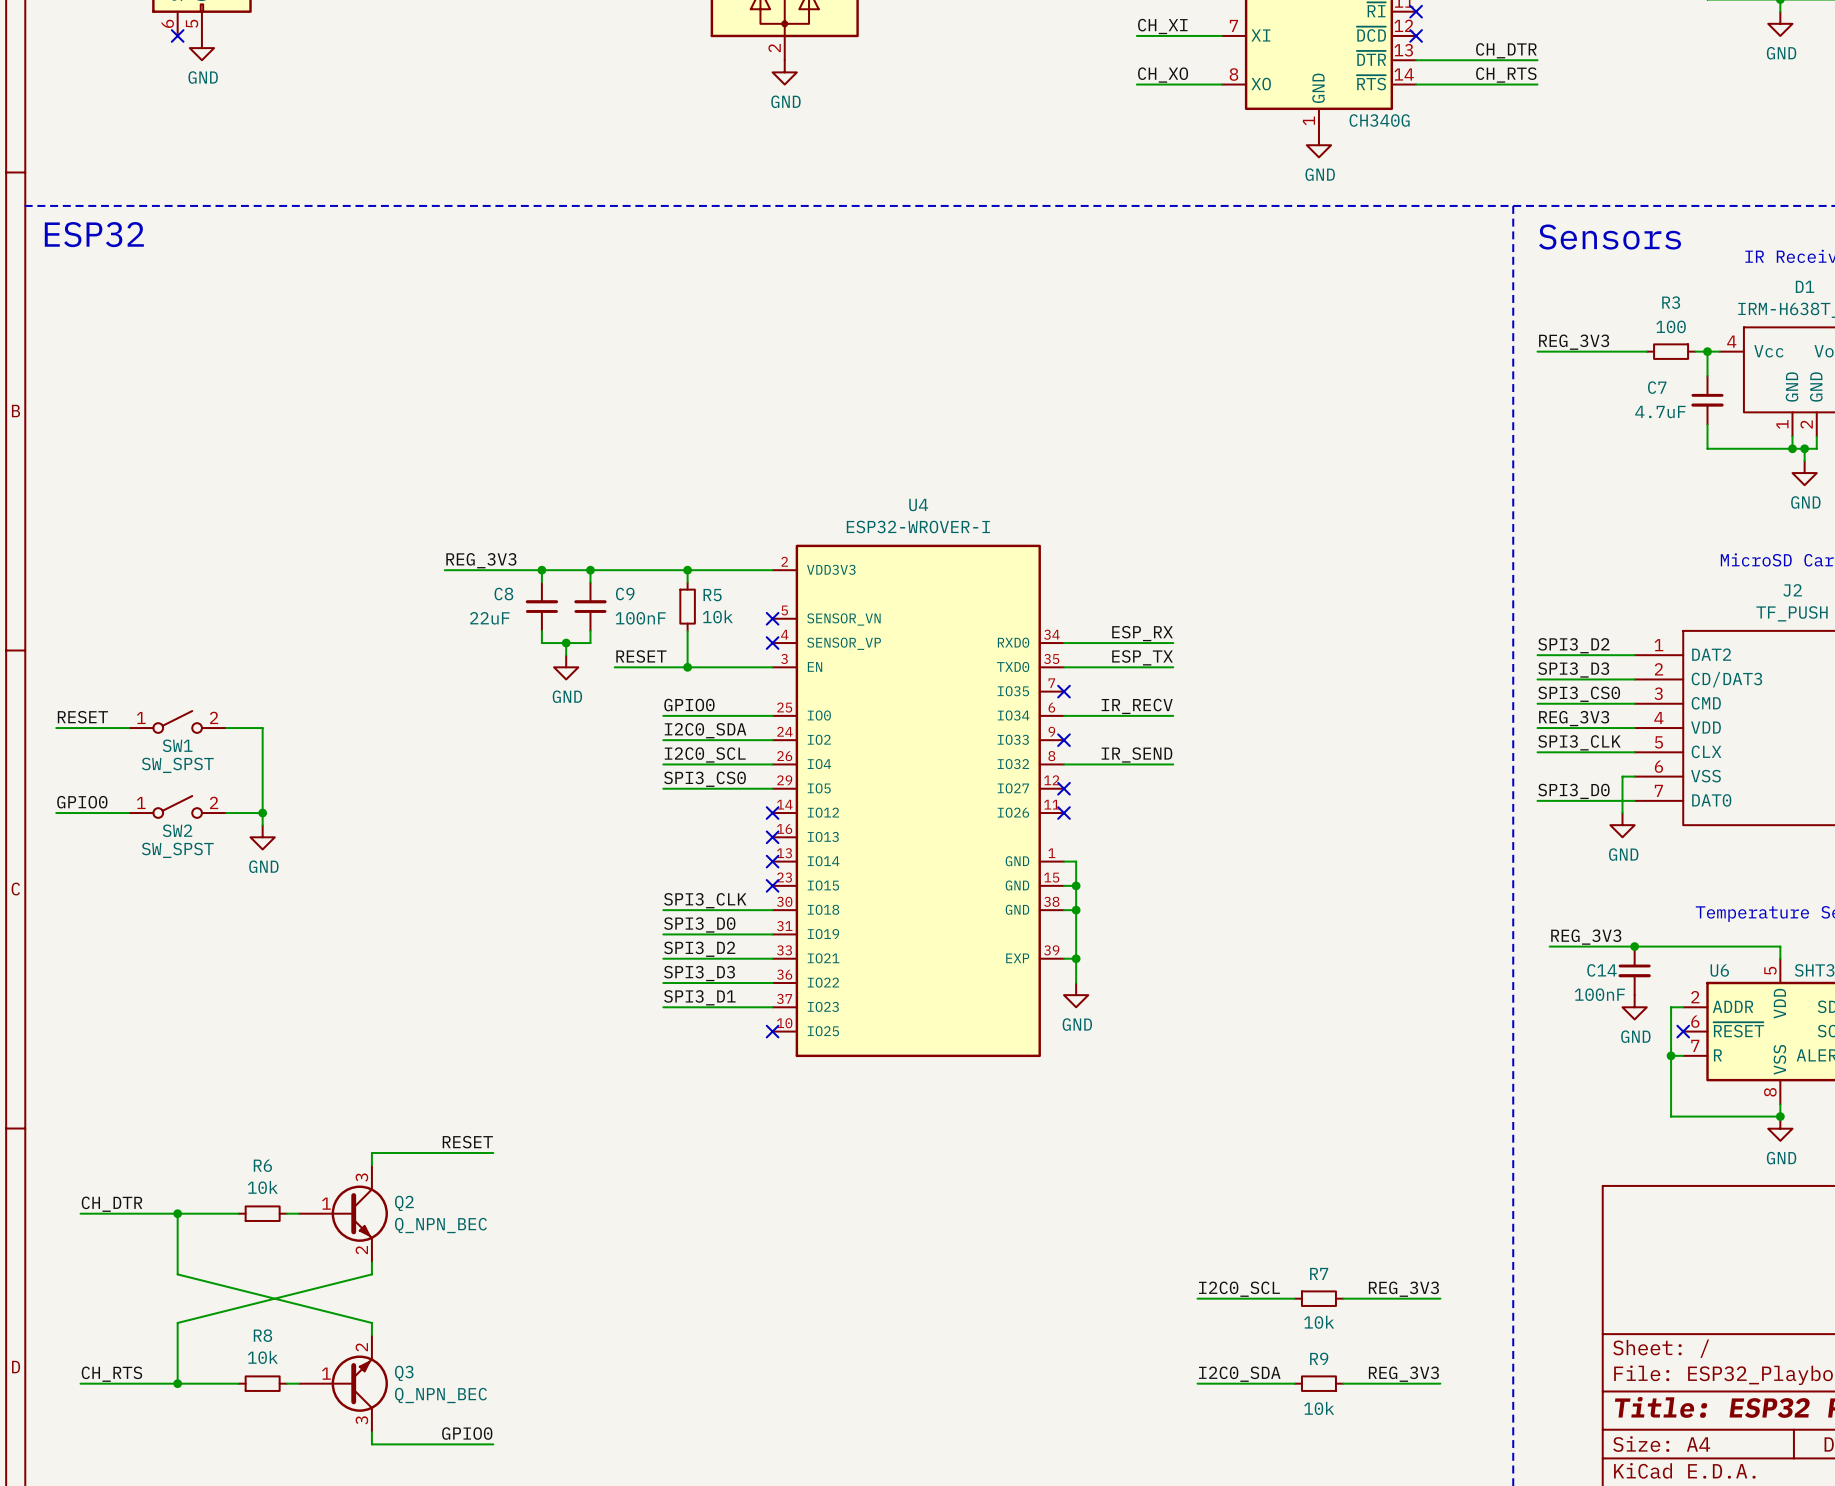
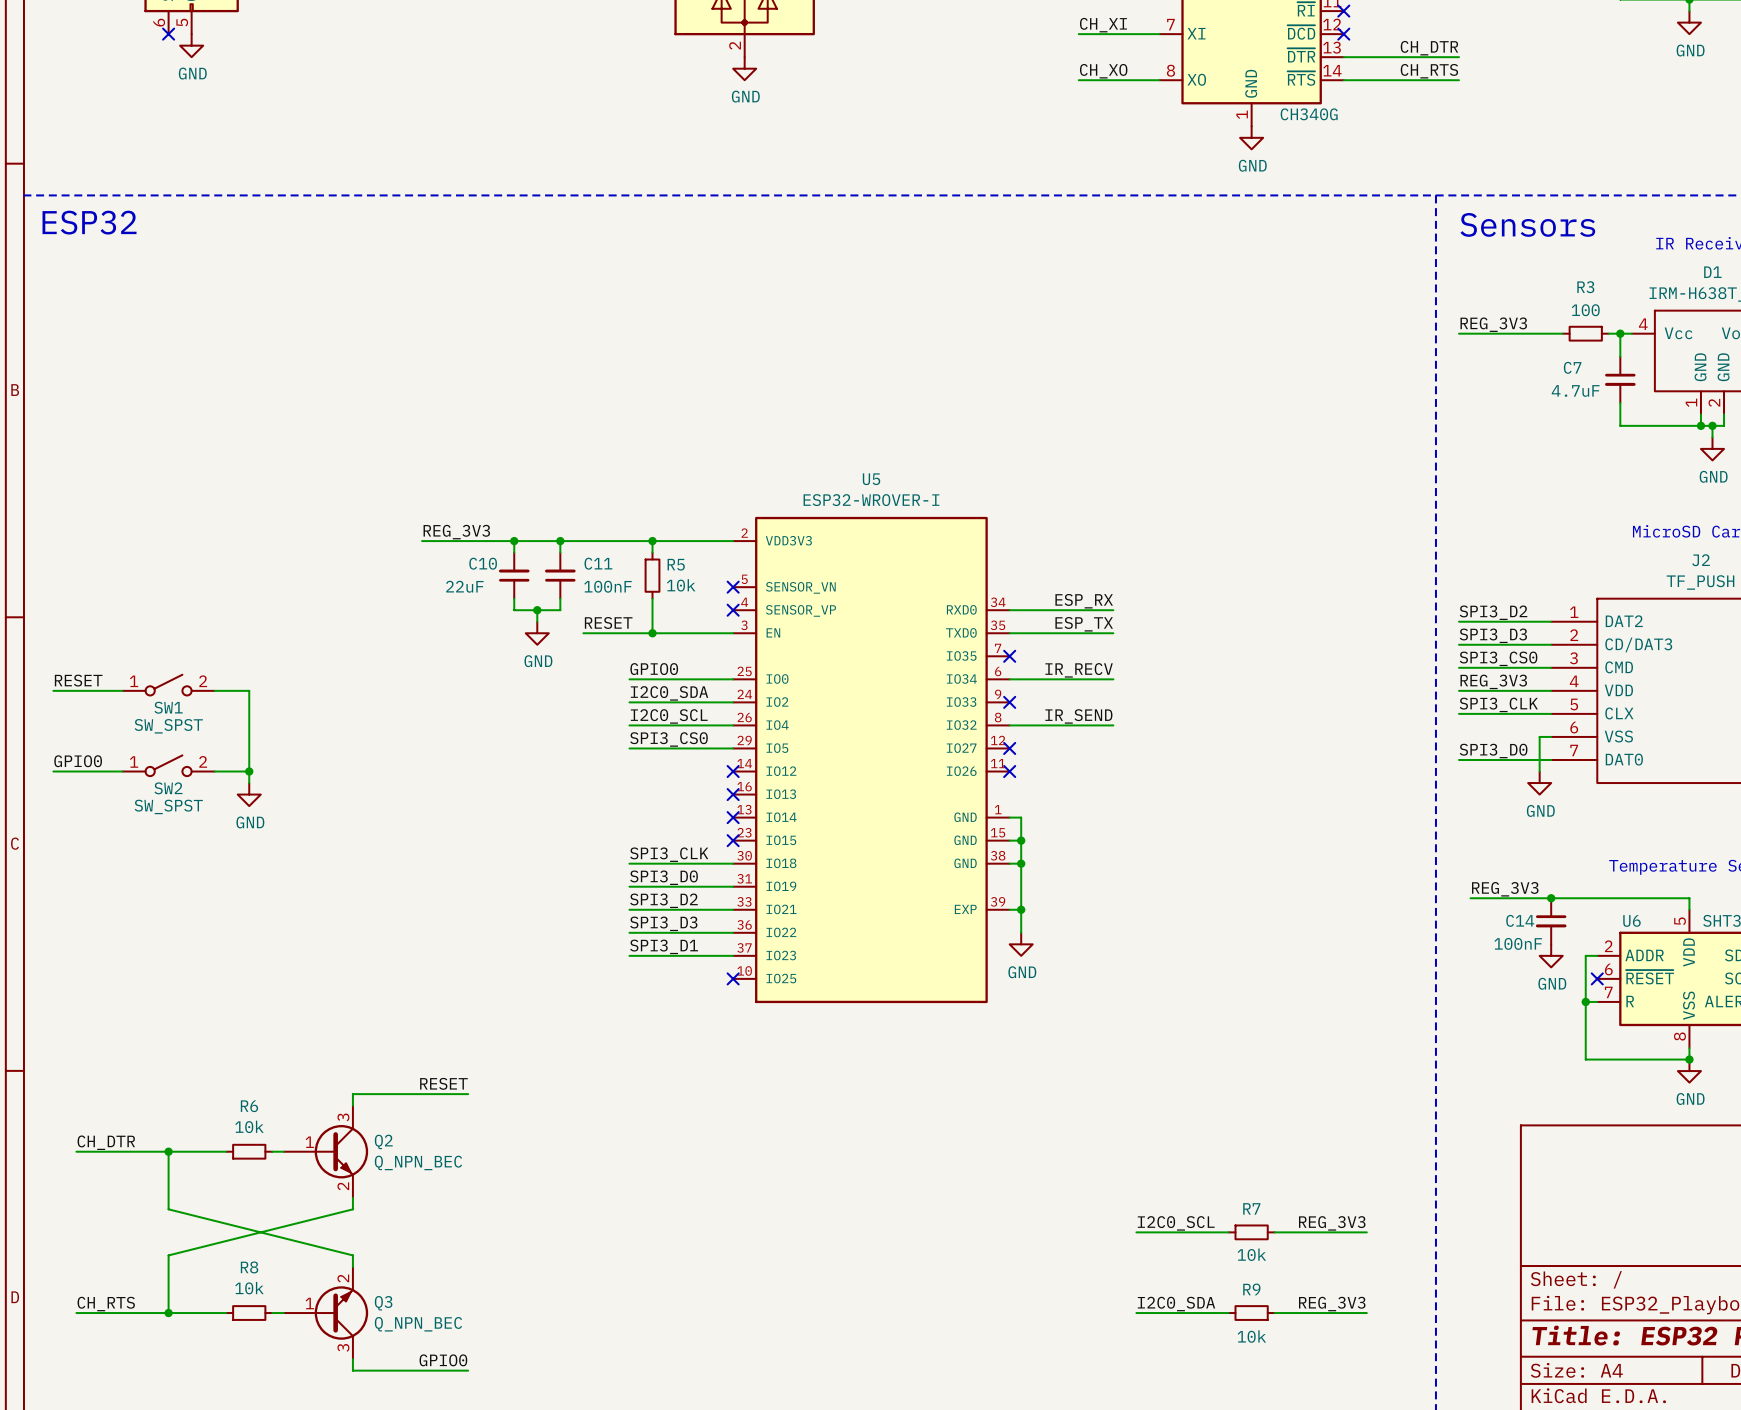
U4 name: U4 (918, 505) -> U5 (871, 479)
C8 name: C8 (503, 594) -> C10 (483, 563)
C9 name: C9 (625, 594) -> C11 (598, 563)

